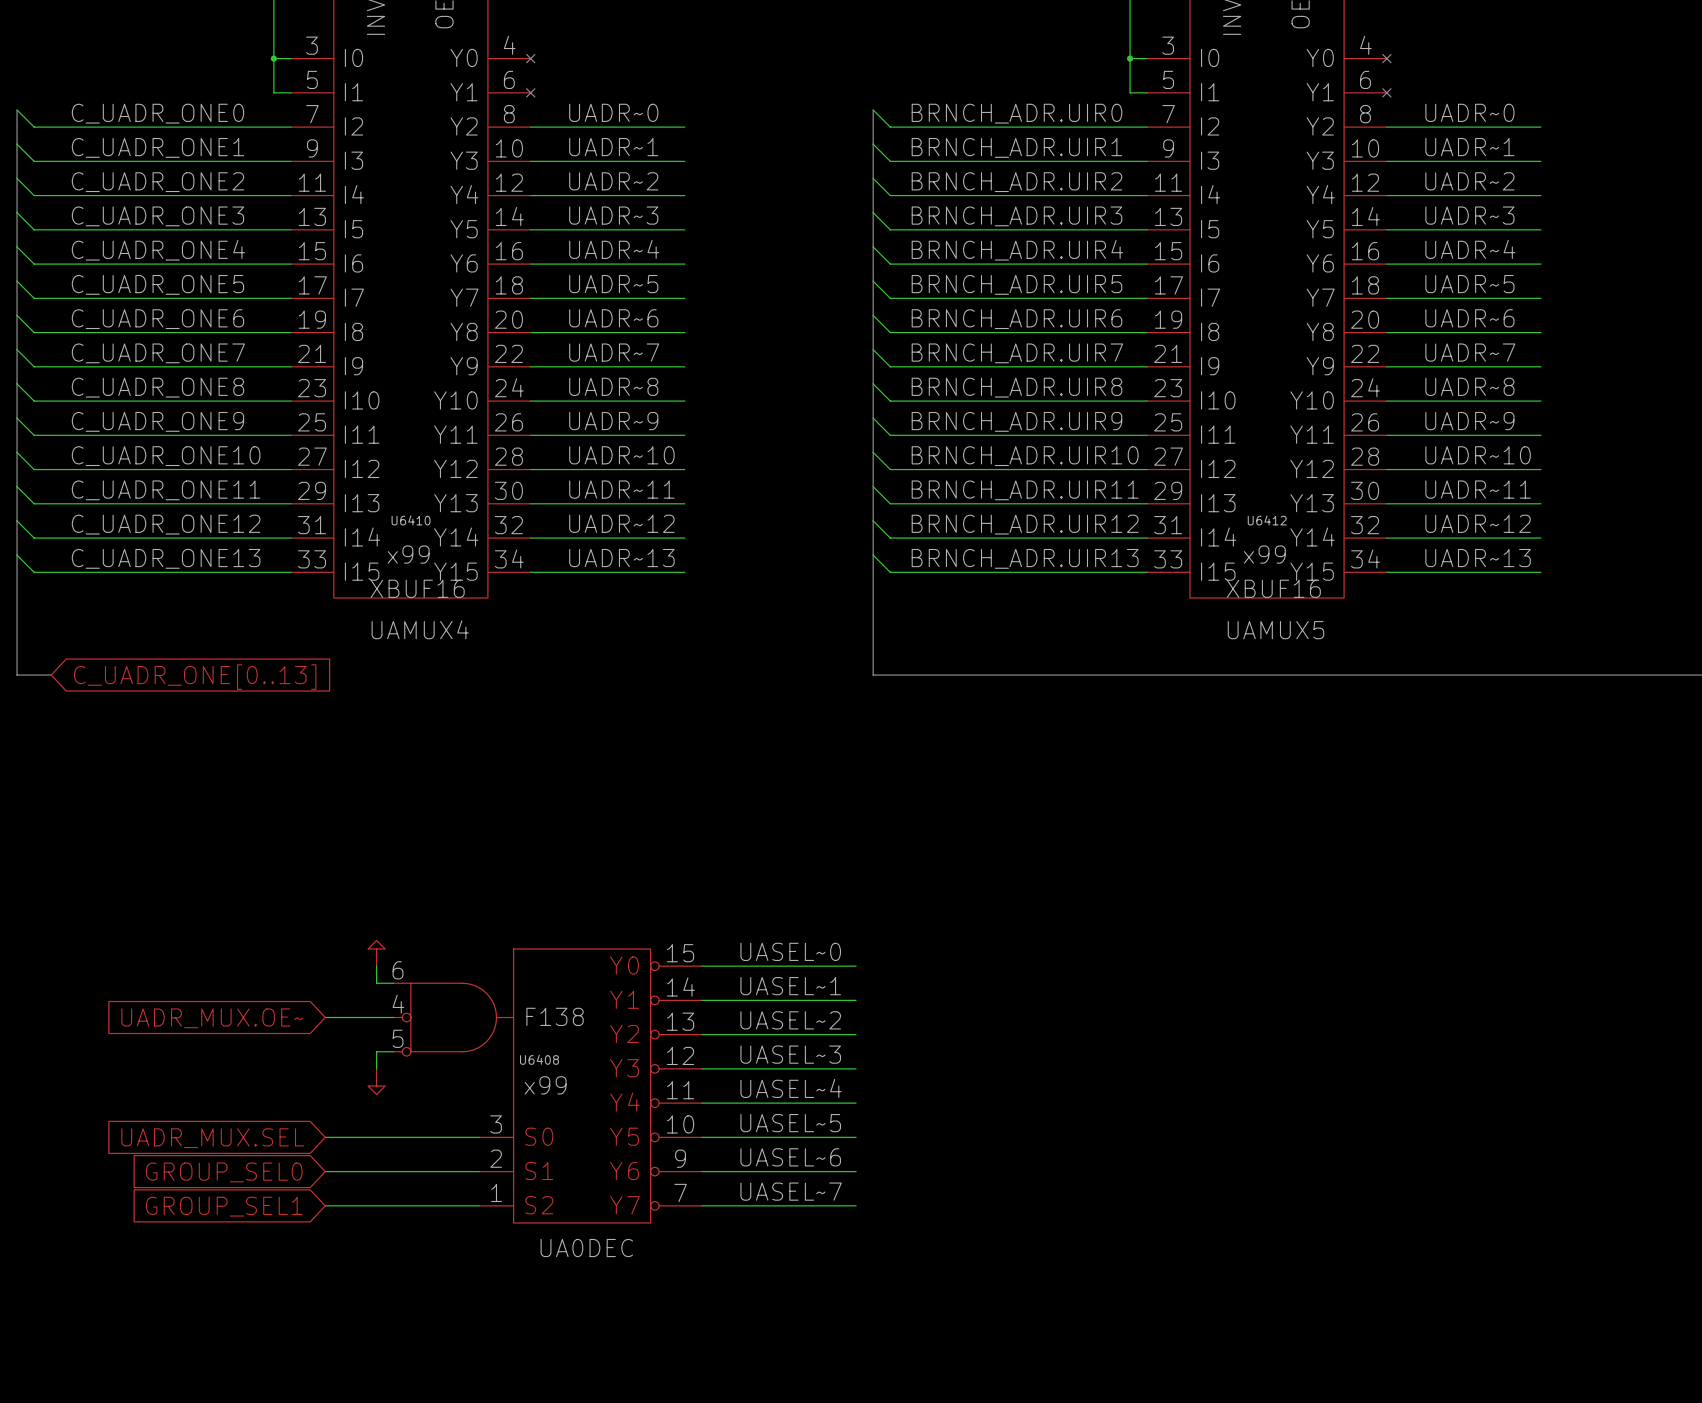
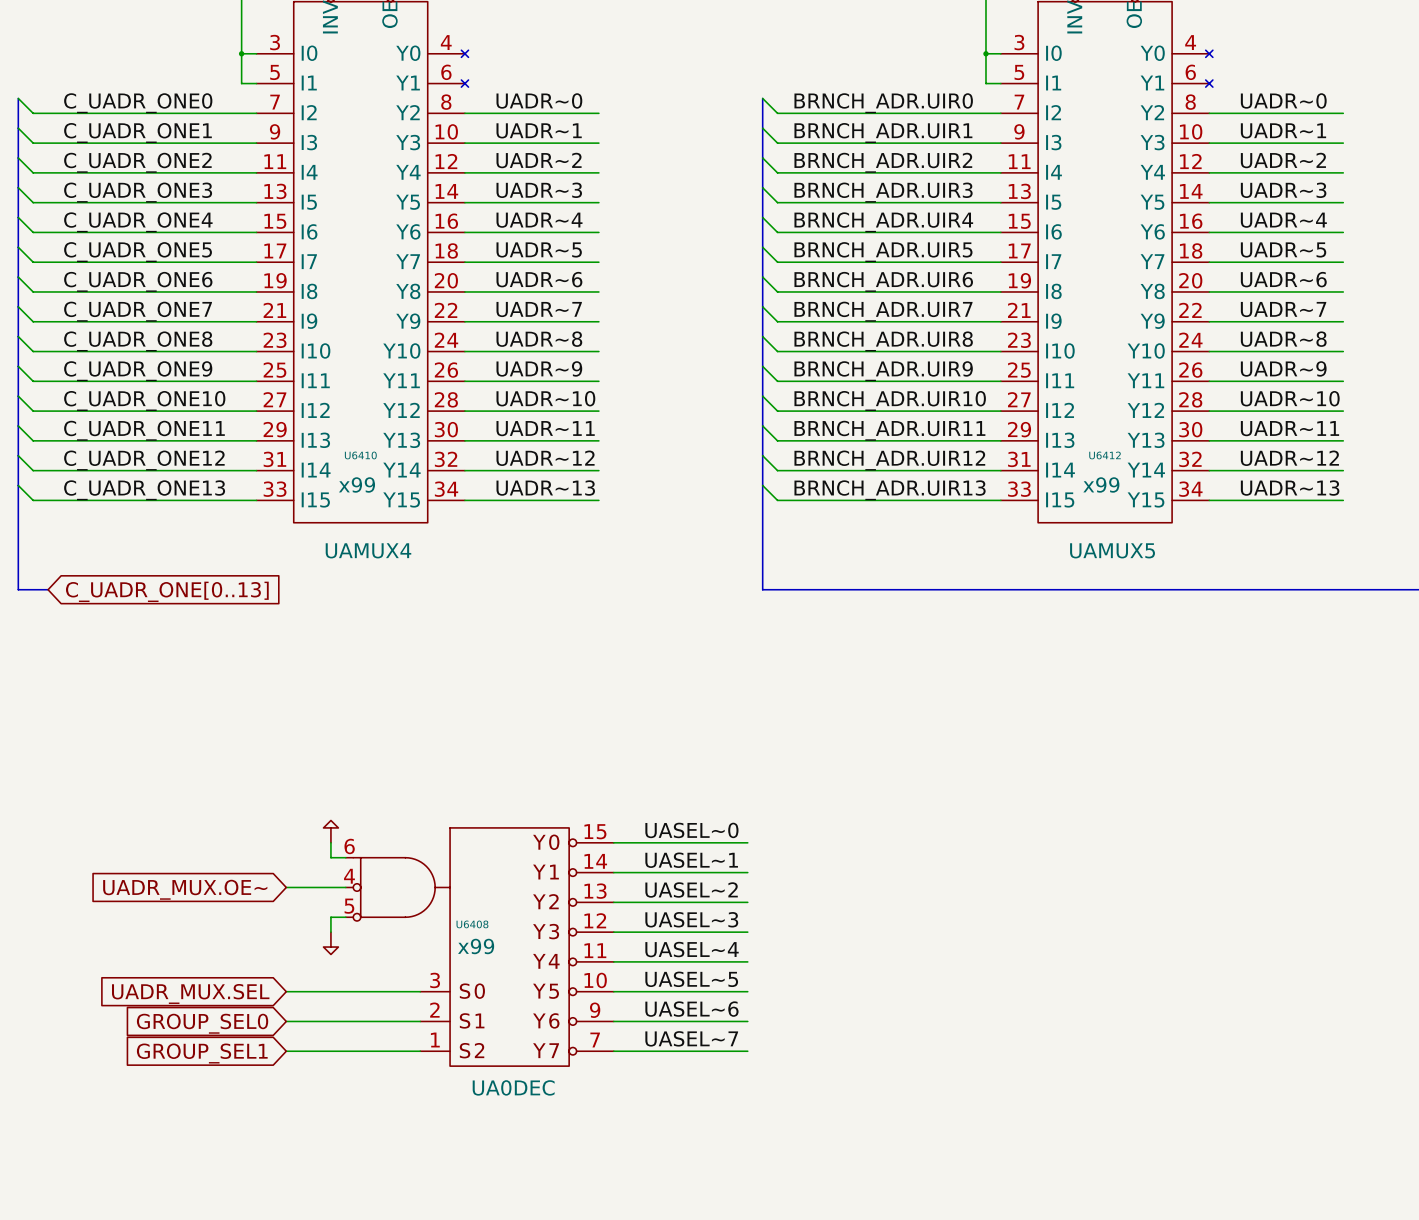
U6410 value: XBUF16 (417, 588) -> none
U6412 value: XBUF16 (1273, 588) -> none
U6408 value: F138 (555, 1016) -> none

